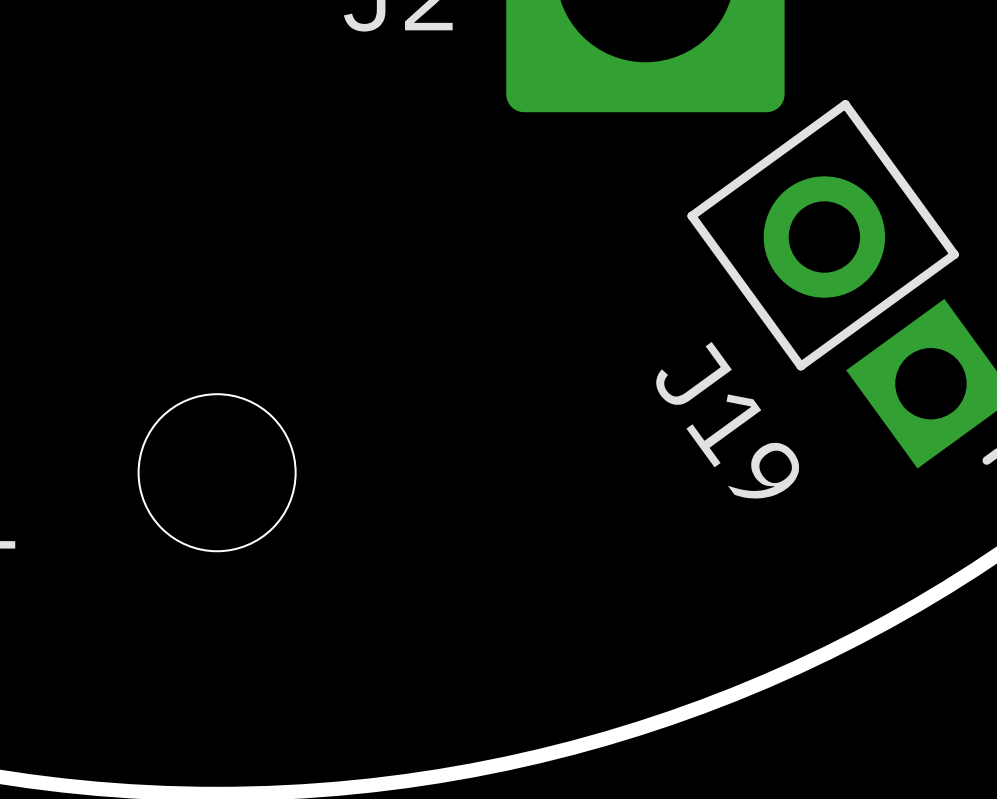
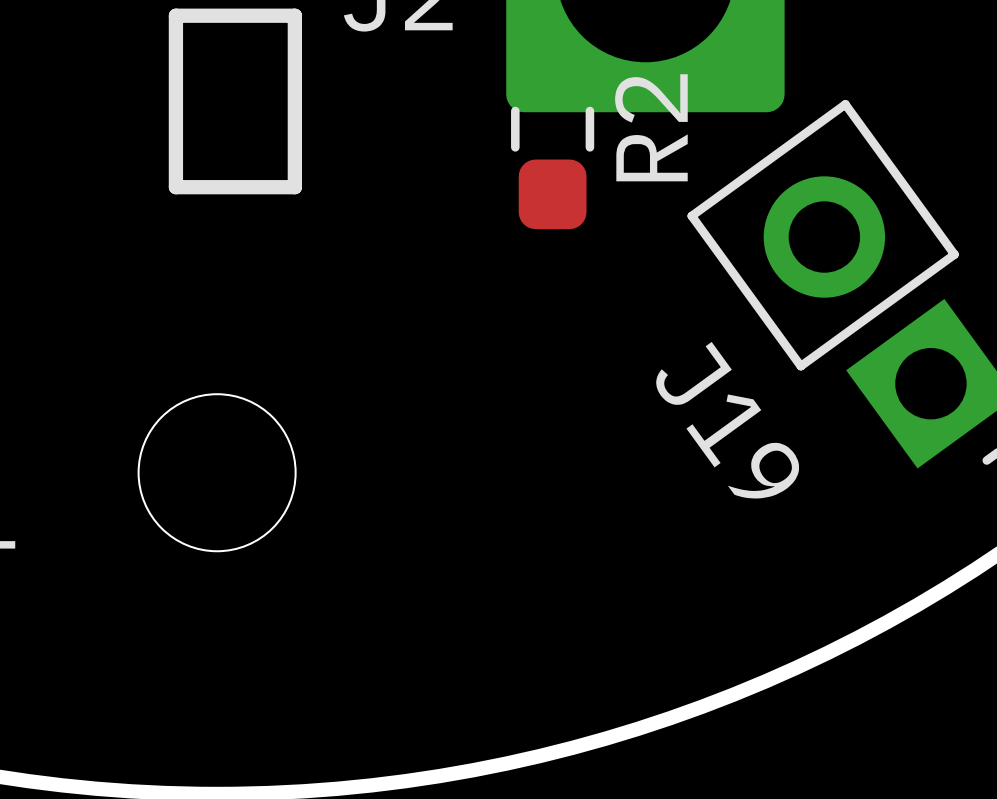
line: none -> (175, 15) (175, 187) (294, 187) (294, 15) (175, 15)
R2: none -> (552, 129)

